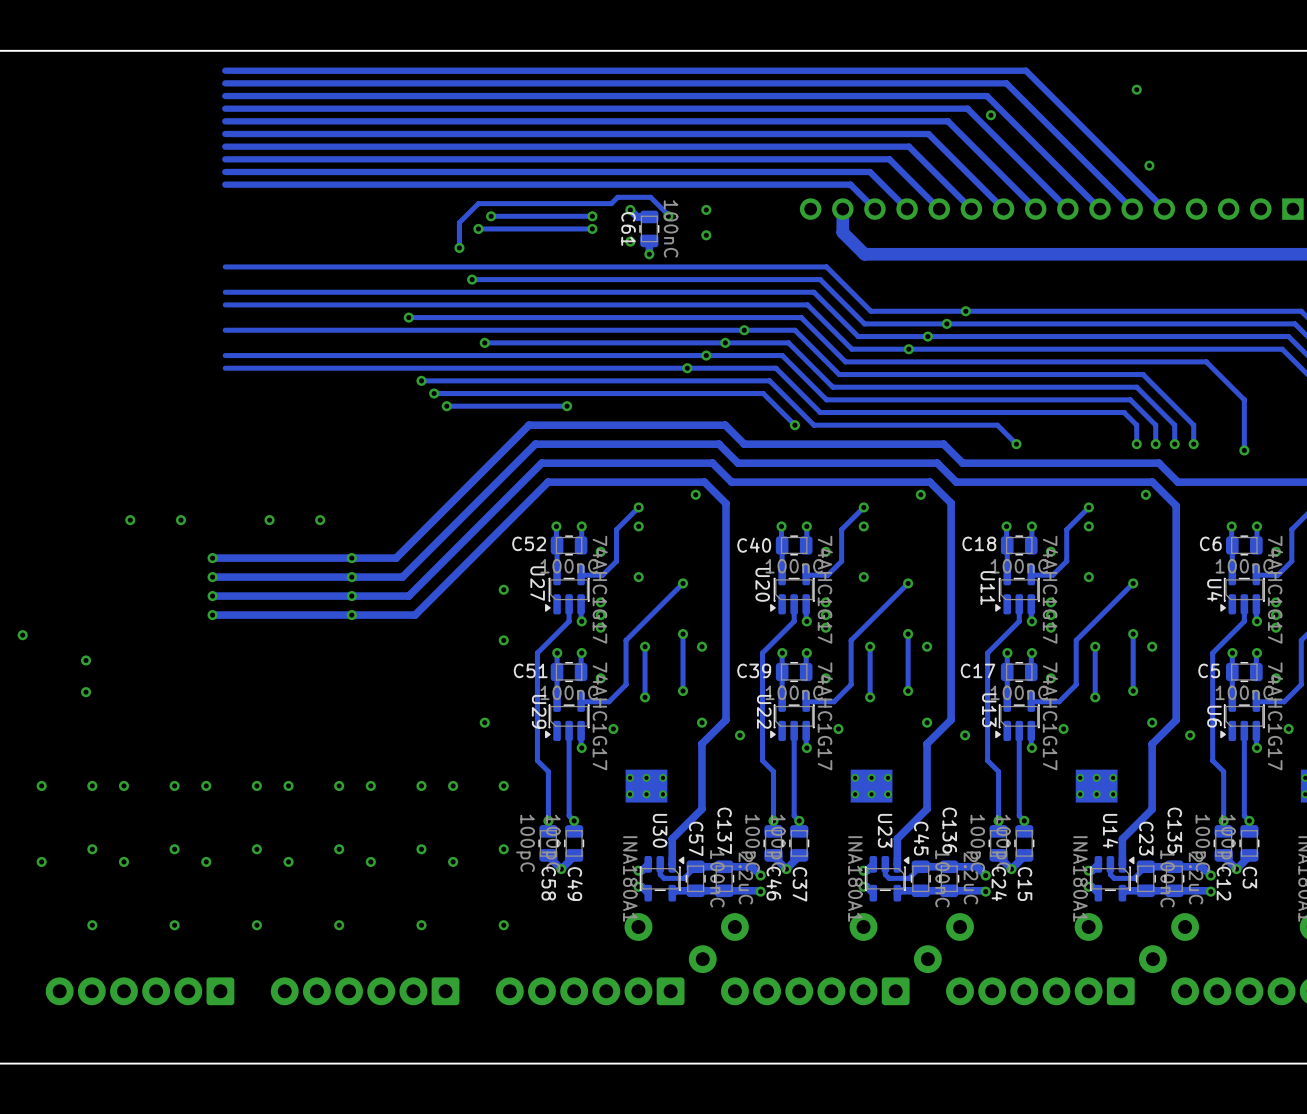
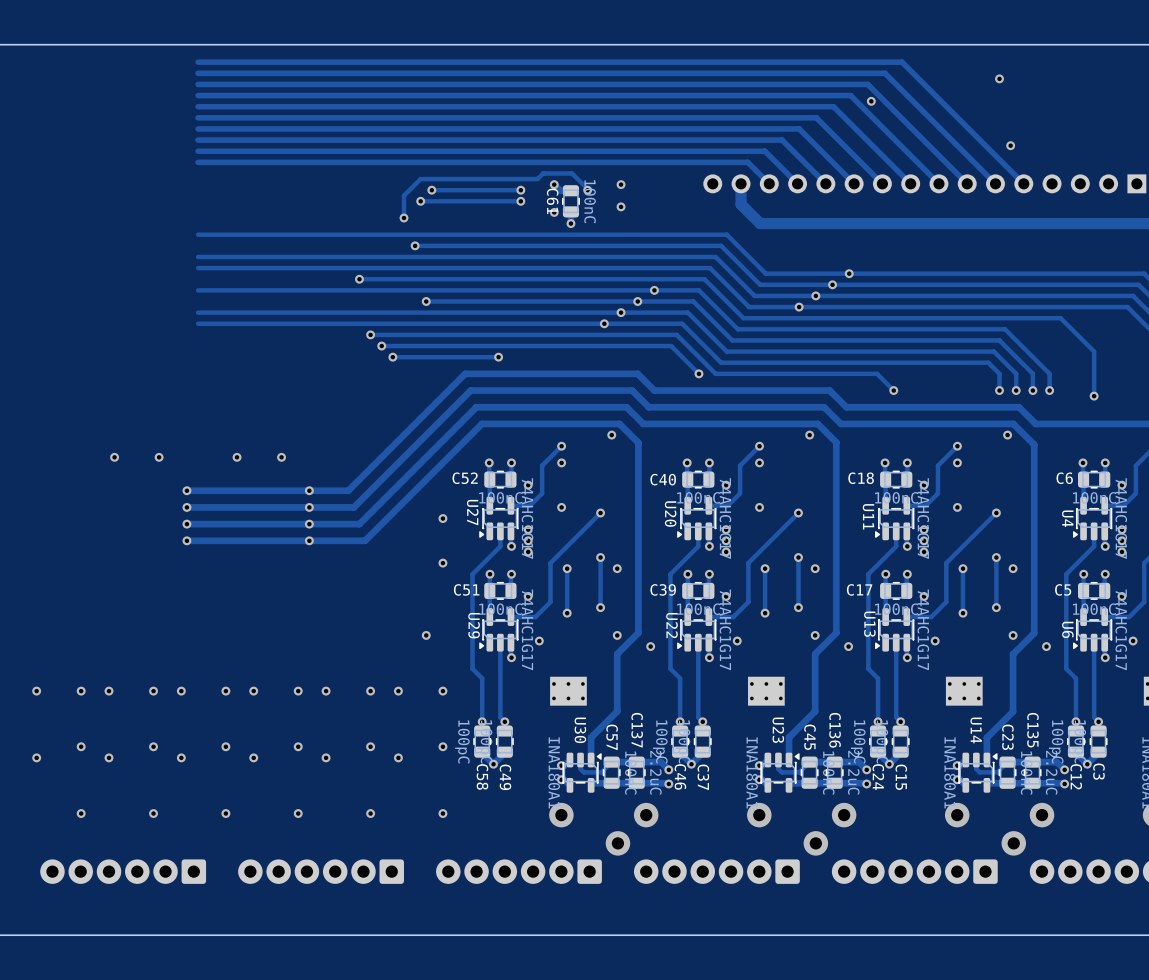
via: (22, 635) -> none
via: (85, 660) -> none
via: (85, 692) -> none

